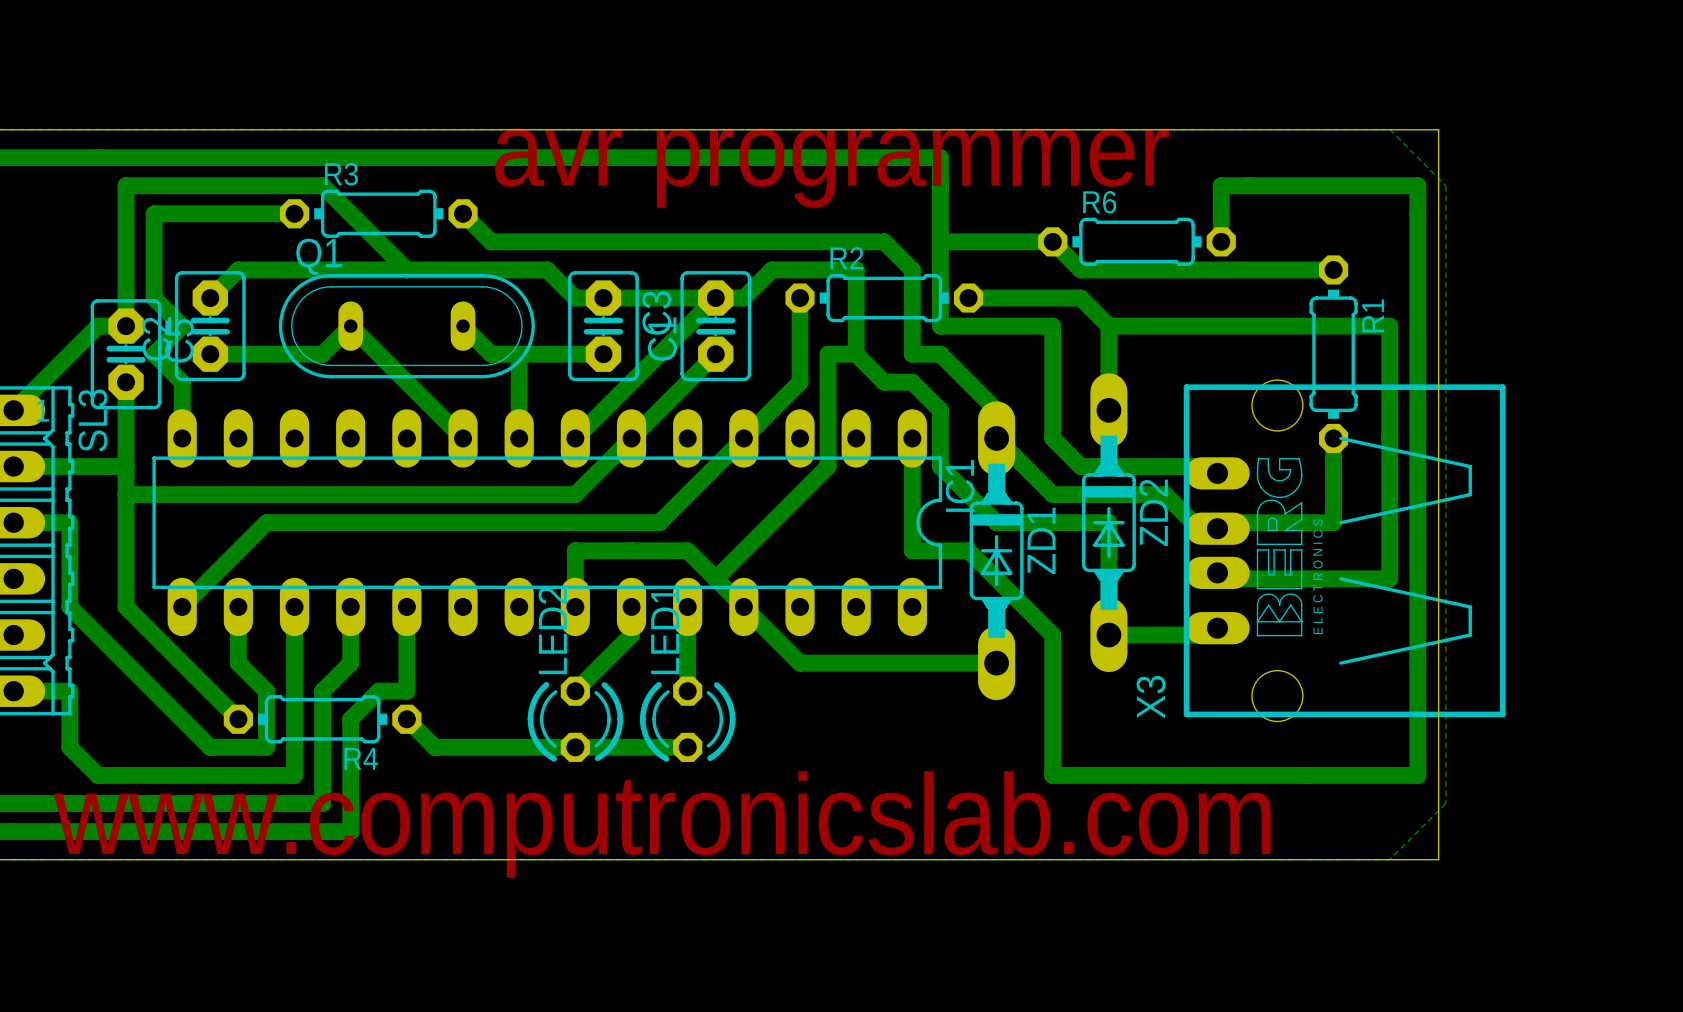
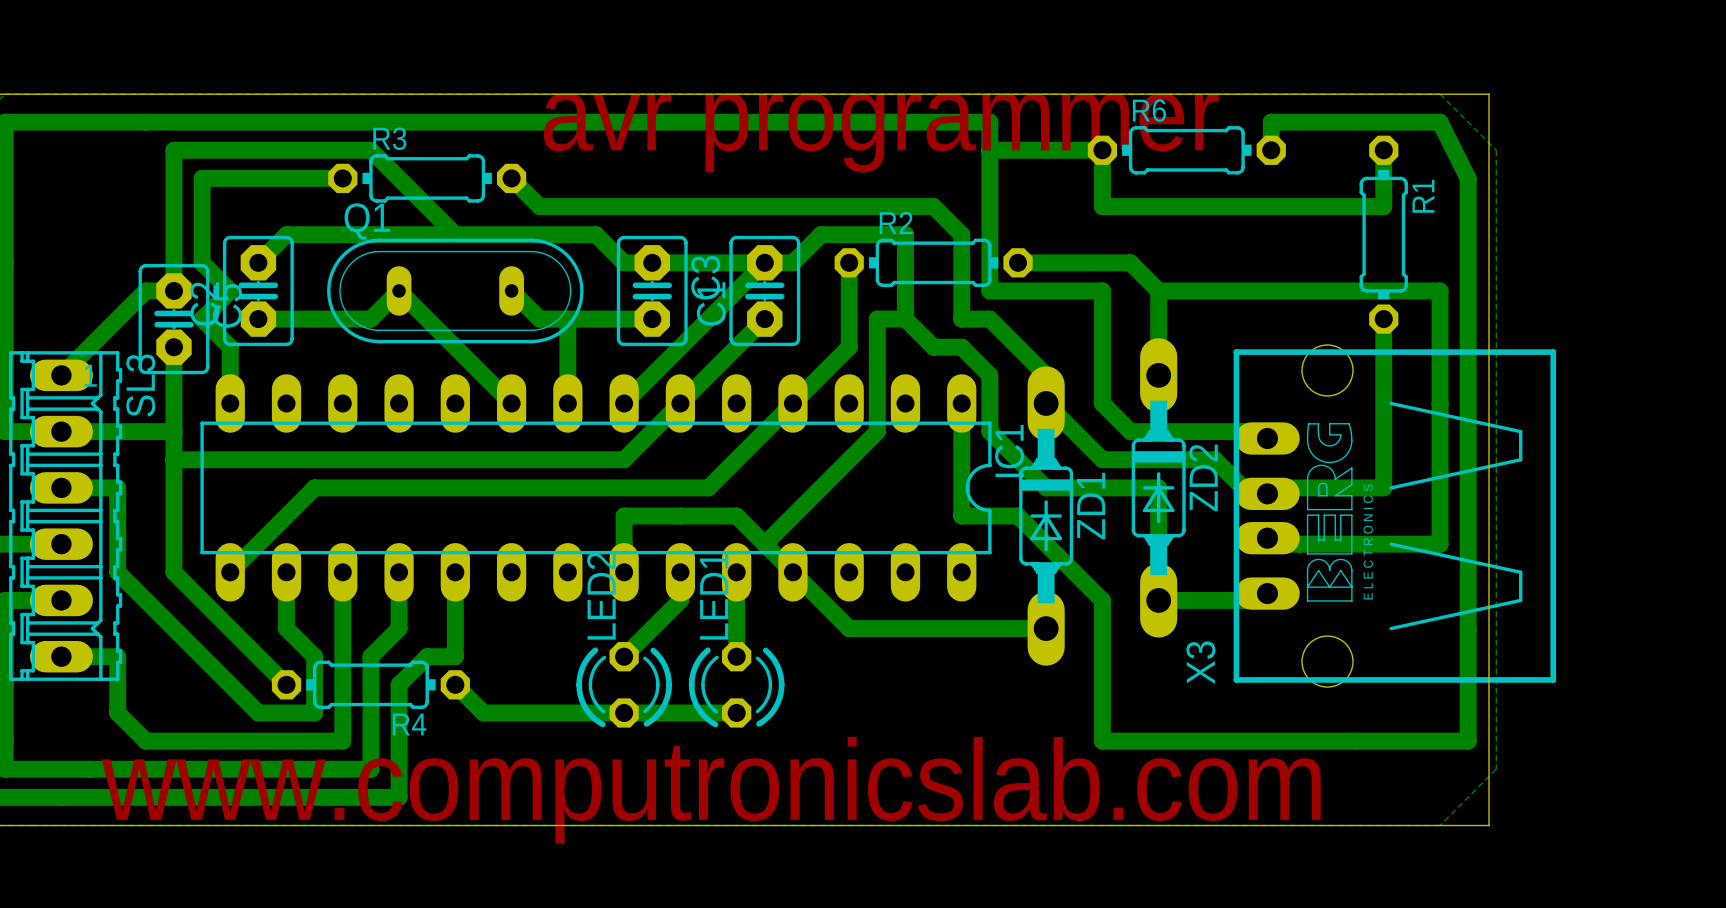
bottom track: none -> (989, 150) (1102, 150) (1102, 206) (1383, 206) (1383, 150)
bottom track: (1417, 213) (1417, 185) (1221, 185) (1221, 241) -> (1468, 178) (1440, 122) (1271, 122) (1271, 150)
bottom track: (940, 241) (1052, 241) (1080, 269) (1333, 269) -> none
R6 position: (1137, 241) -> (1186, 150)
bottom track: none -> (1383, 319) (1383, 403)
R1 position: (1333, 354) -> (1383, 234)

